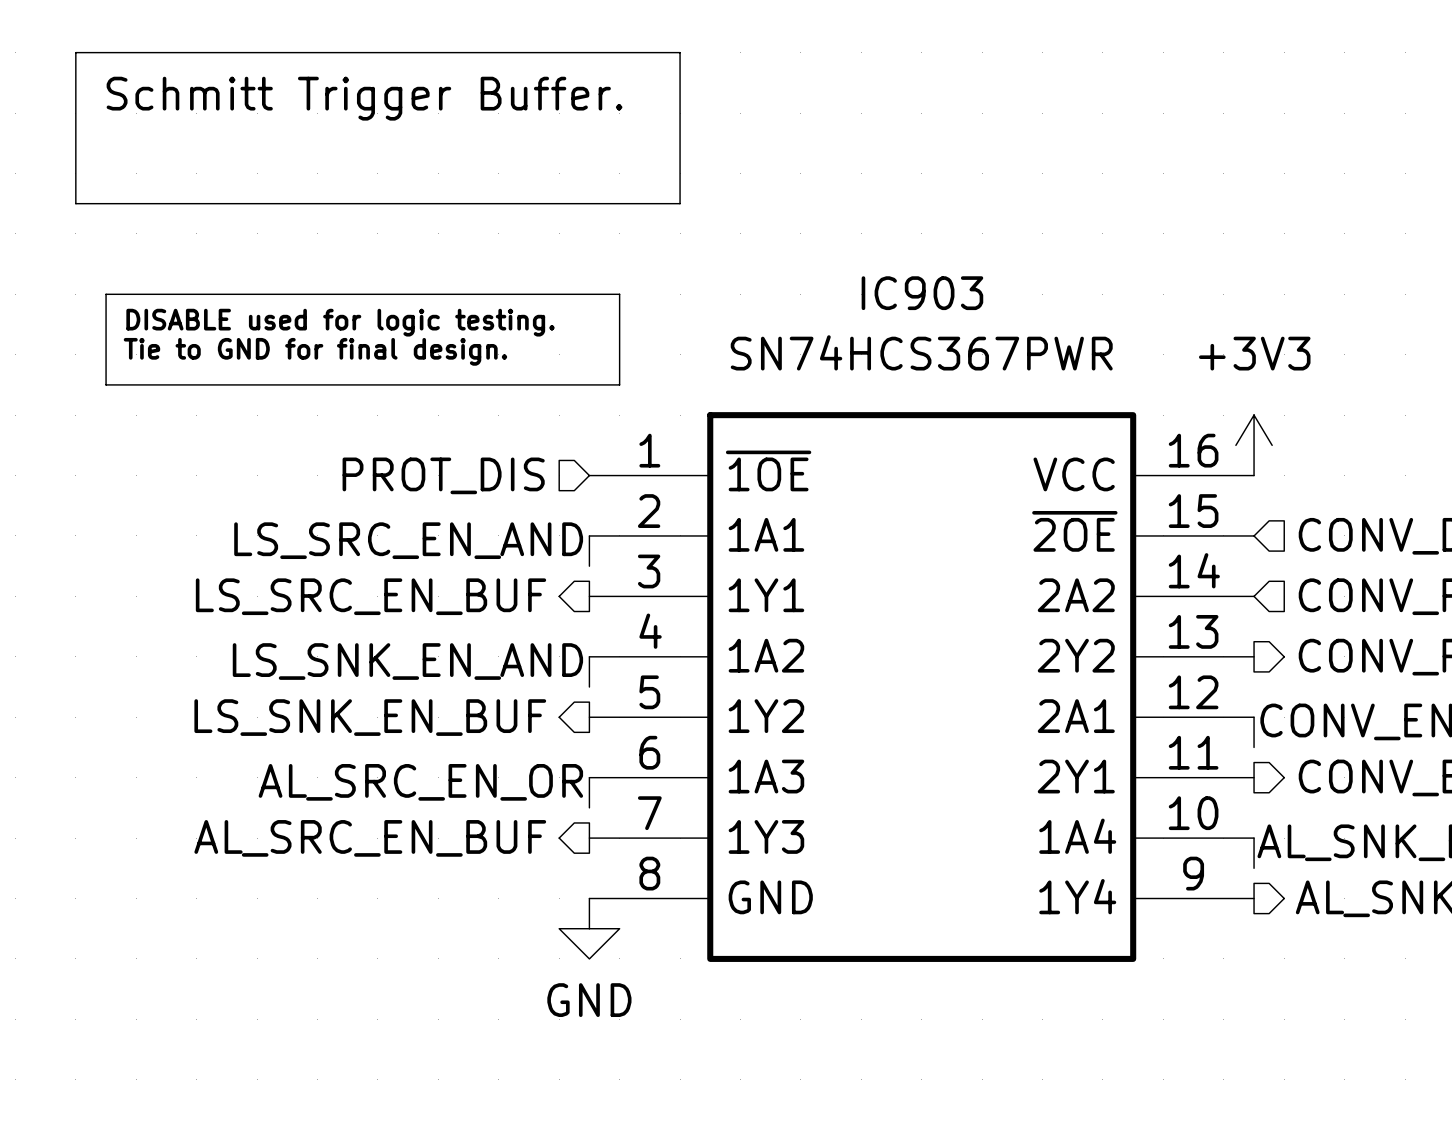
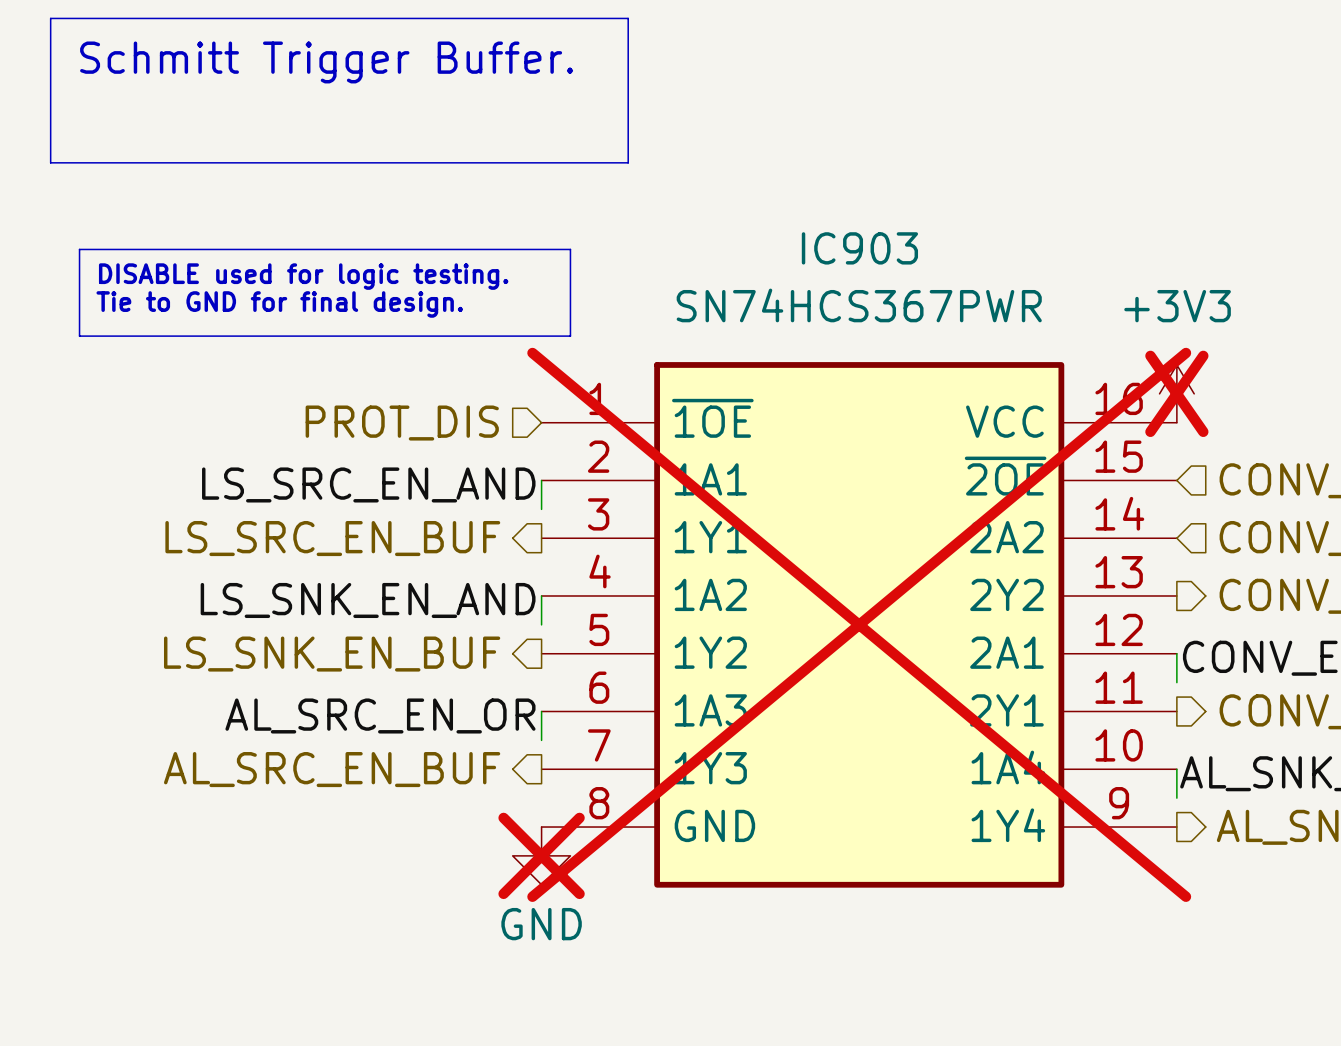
power symbol do-not-place cross: none -> (1176, 393)
IC903 do-not-place cross: none -> (859, 624)
power symbol do-not-place cross: none -> (541, 855)

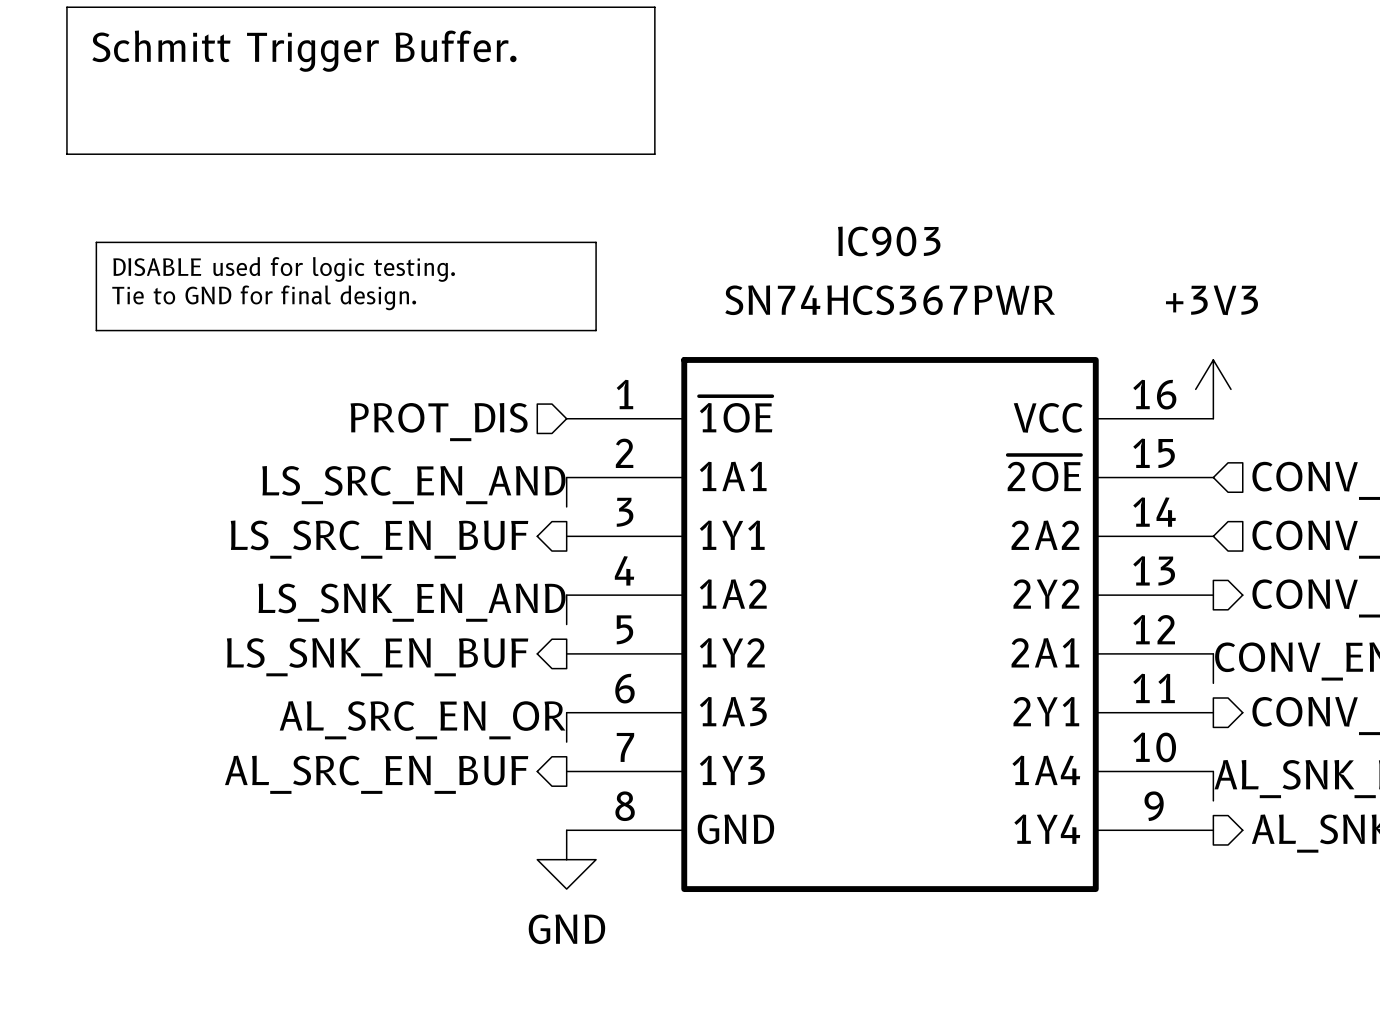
power symbol do-not-place cross: (1176, 393) -> none
IC903 do-not-place cross: (859, 624) -> none
power symbol do-not-place cross: (541, 855) -> none

